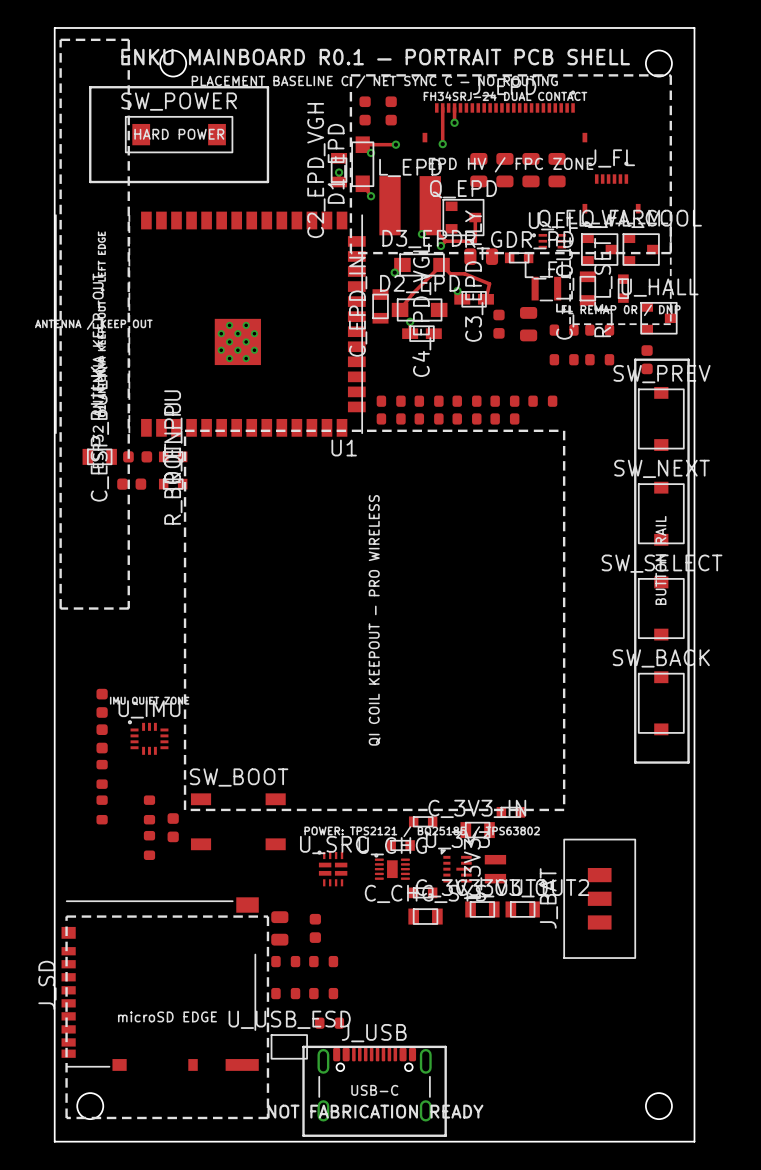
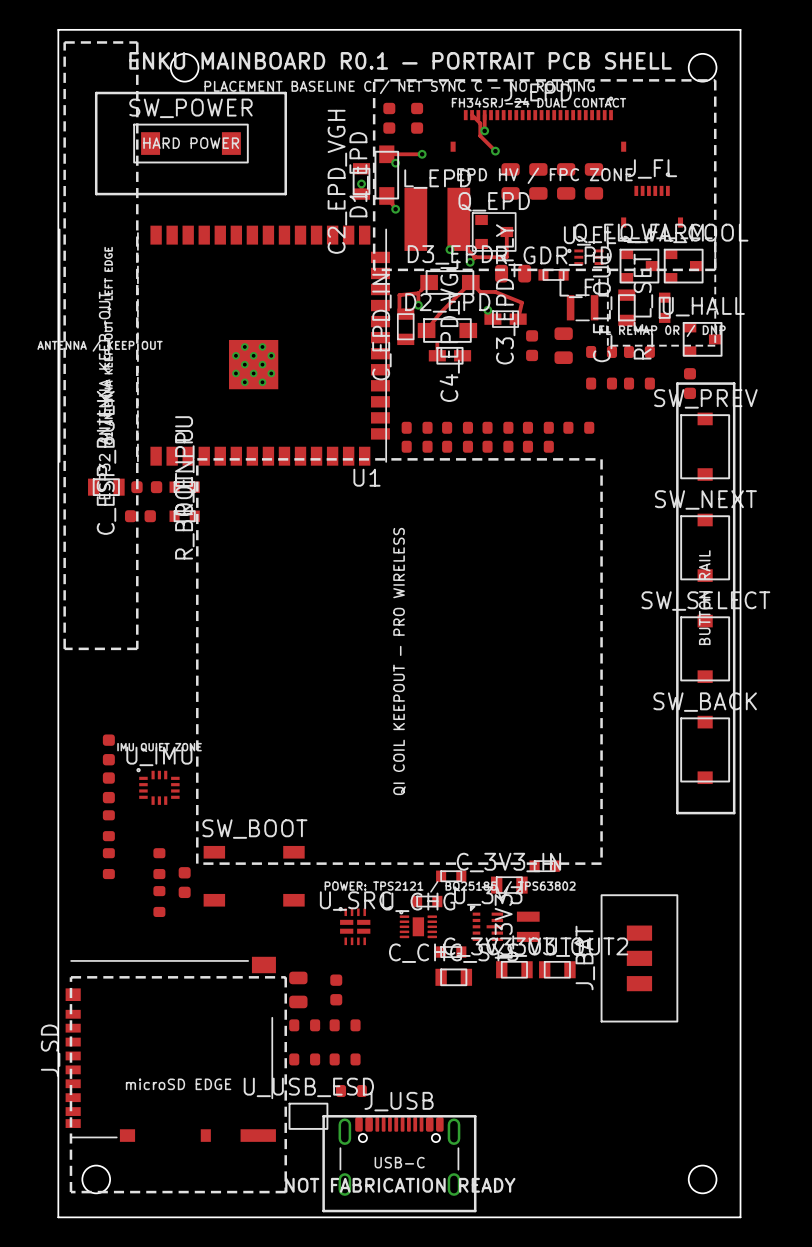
track: (442, 107) (442, 144) -> (472, 115) (480, 123) (480, 135) (495, 151)
via position: (442, 144) -> (495, 151)
via position: (394, 272) -> (418, 305)
track: none -> (418, 305) (418, 293) (399, 295) (399, 307)
via: (410, 321) -> none

